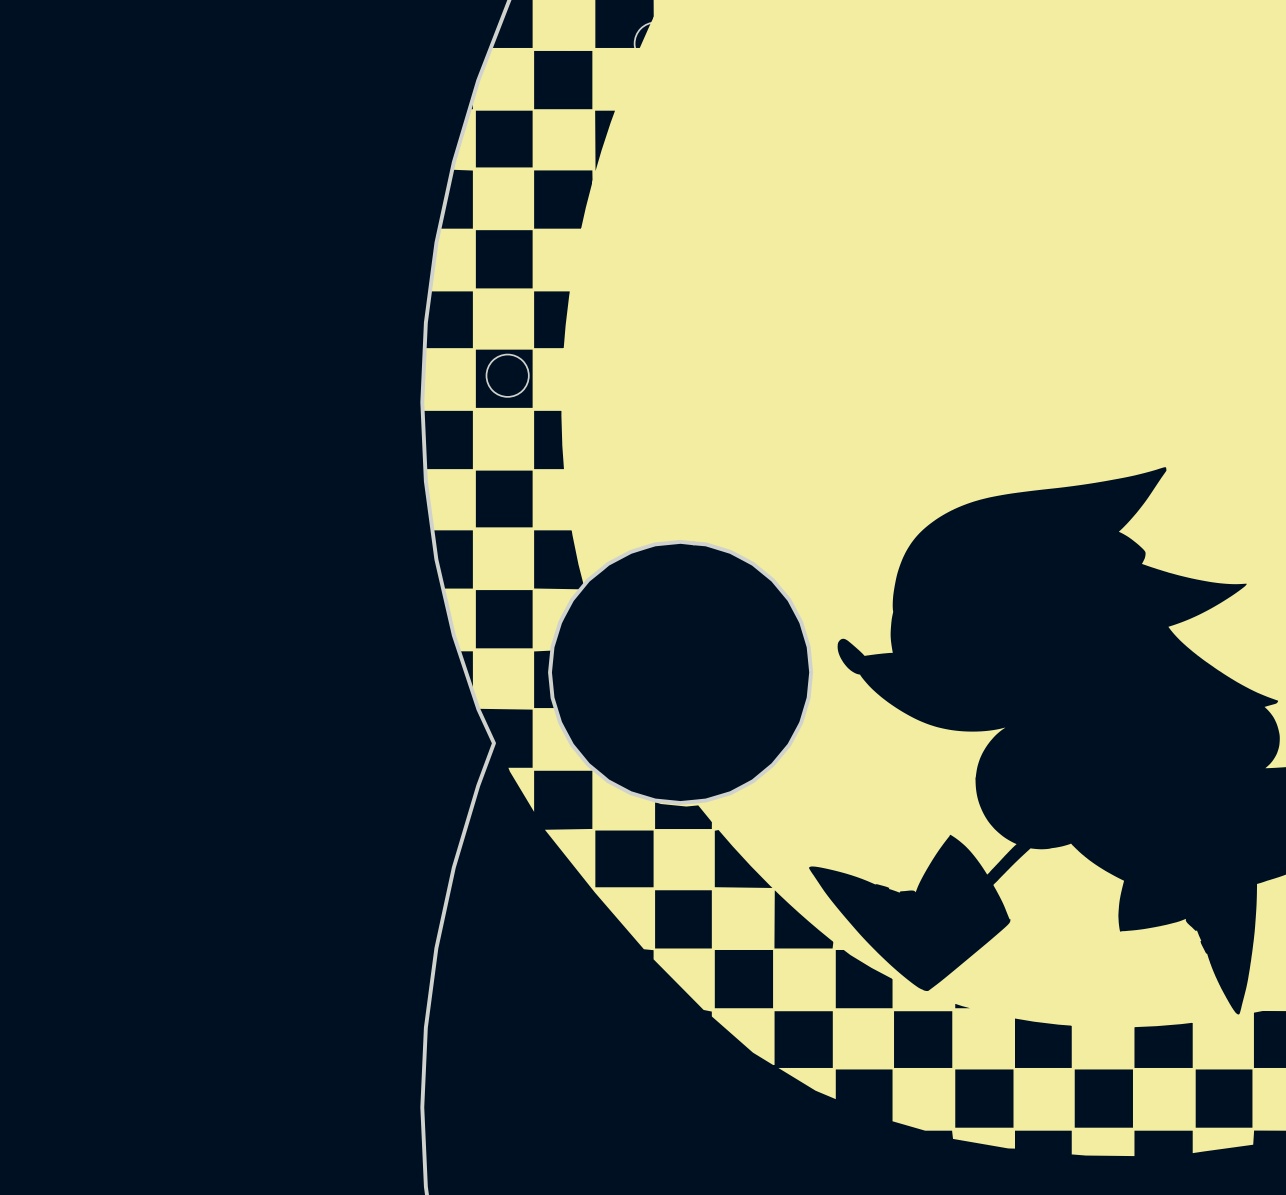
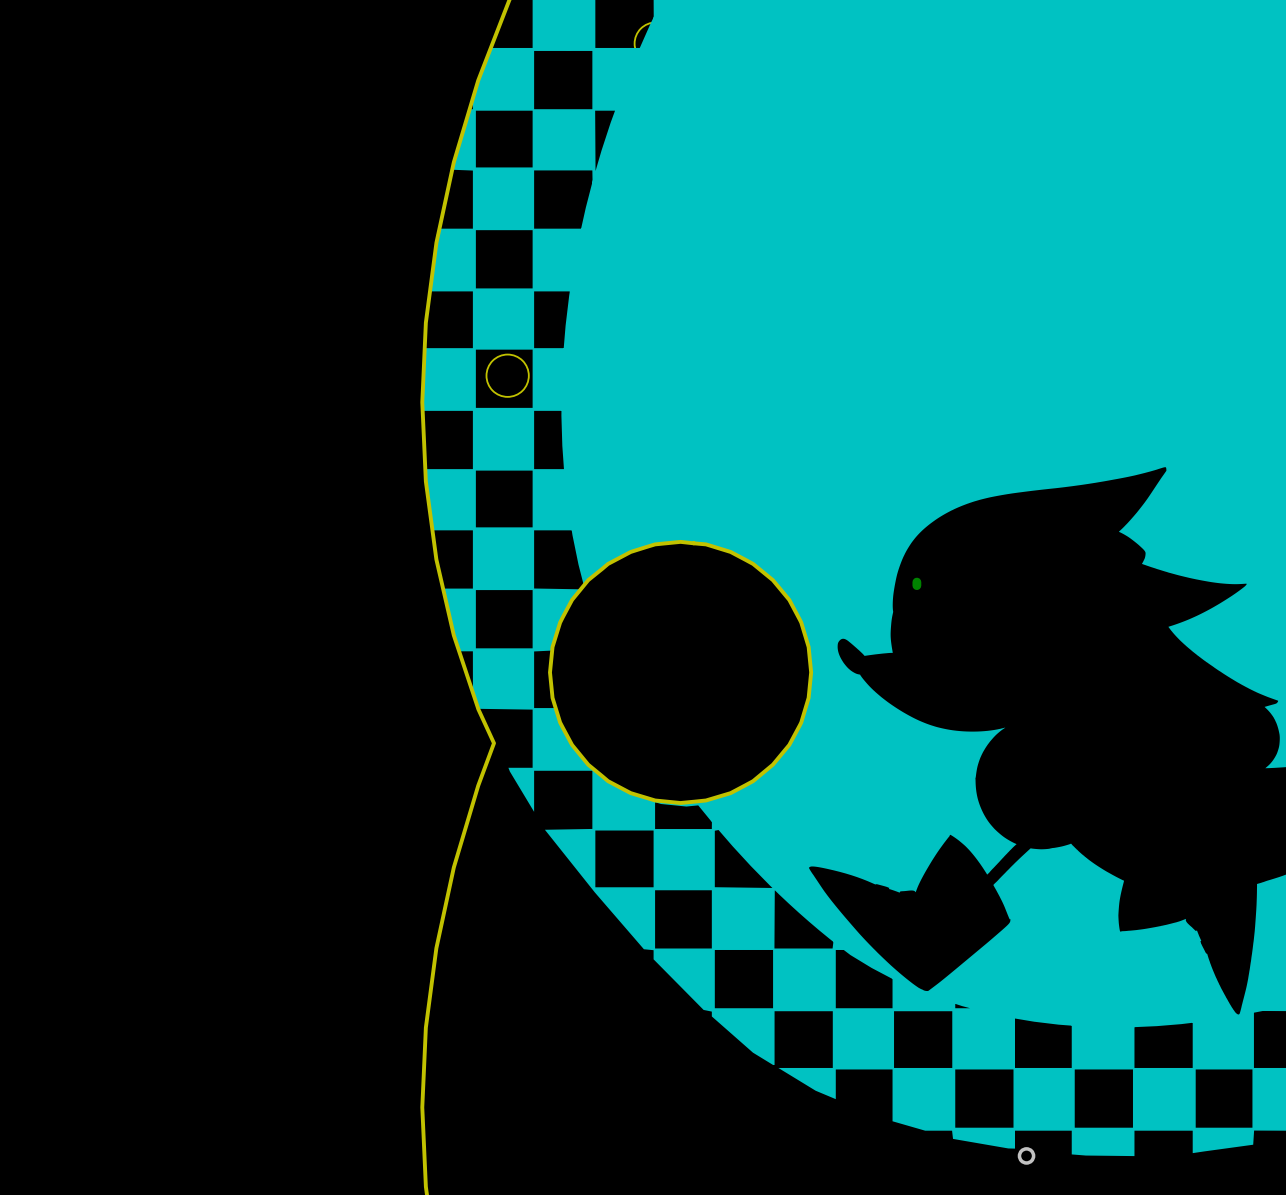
bottom track: none -> (916, 582) (916, 585)
via: none -> (1026, 1155)

